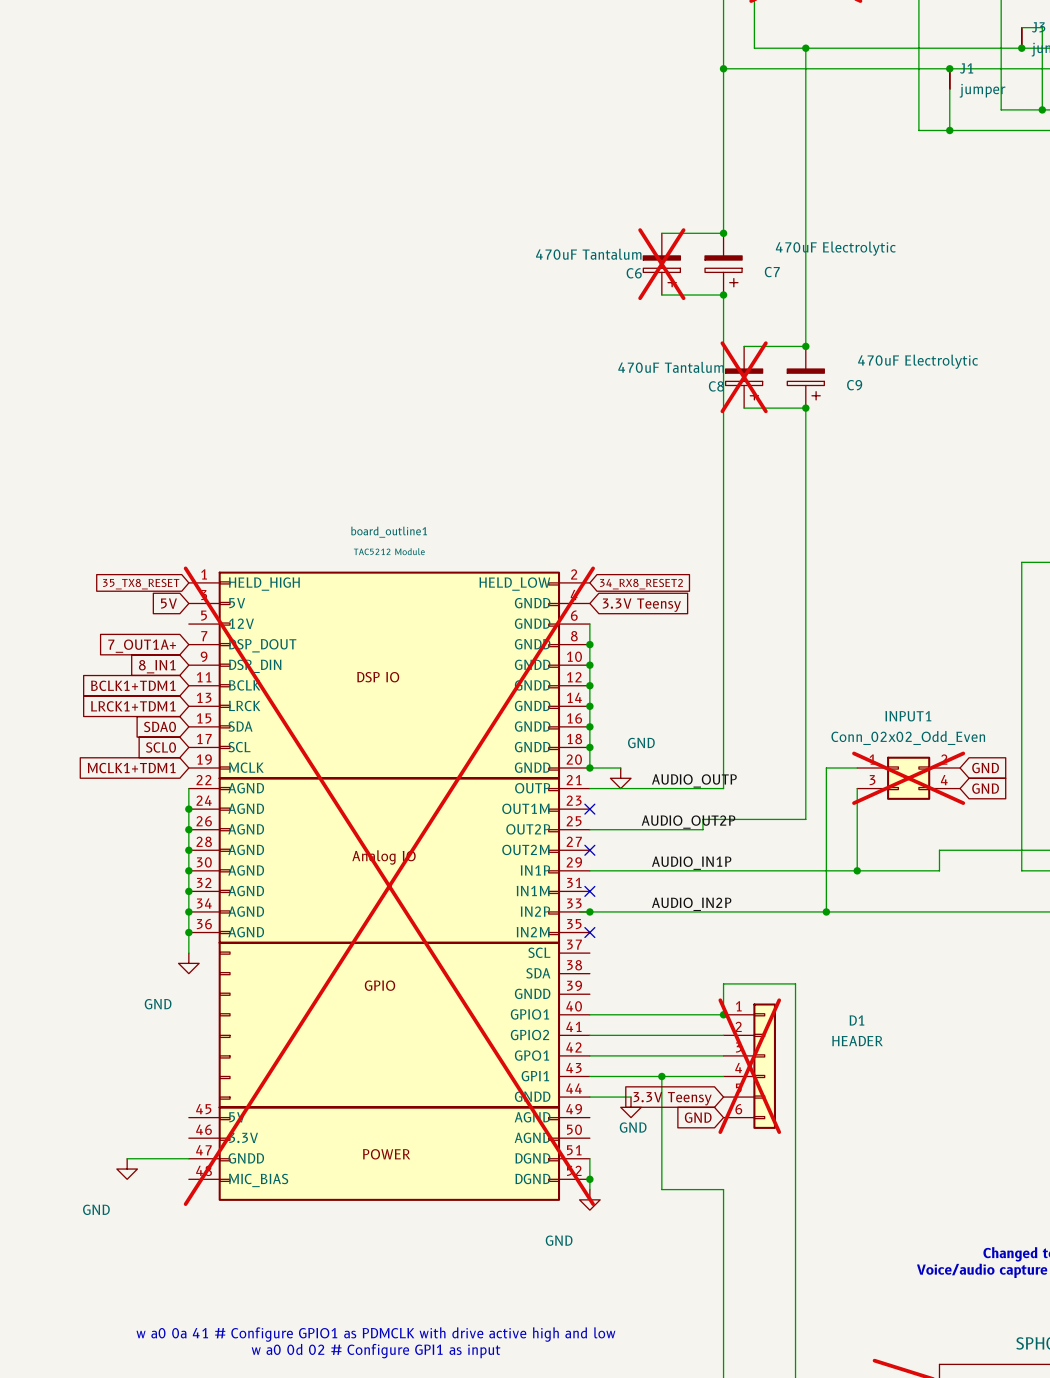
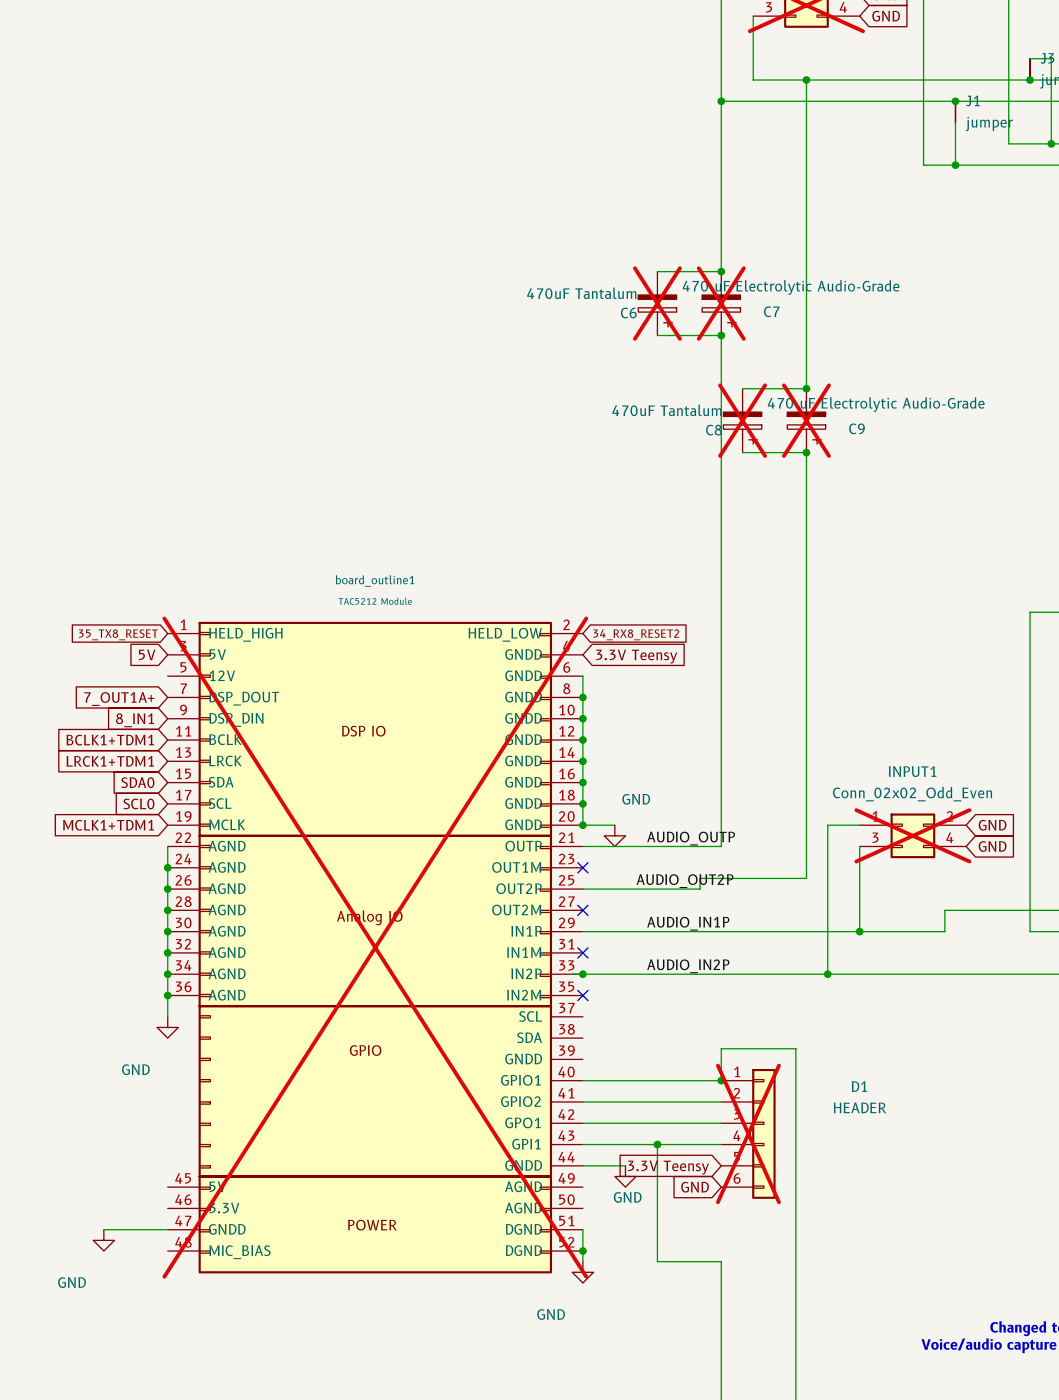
C7 value: 470uF Electrolytic (835, 248) -> 470 uF Electrolytic Audio-Grade (791, 287)
C7 do-not-place cross: none -> (721, 303)
C9 value: 470uF Electrolytic (918, 361) -> 470 uF Electrolytic Audio-Grade (876, 404)
C9 do-not-place cross: none -> (806, 420)

